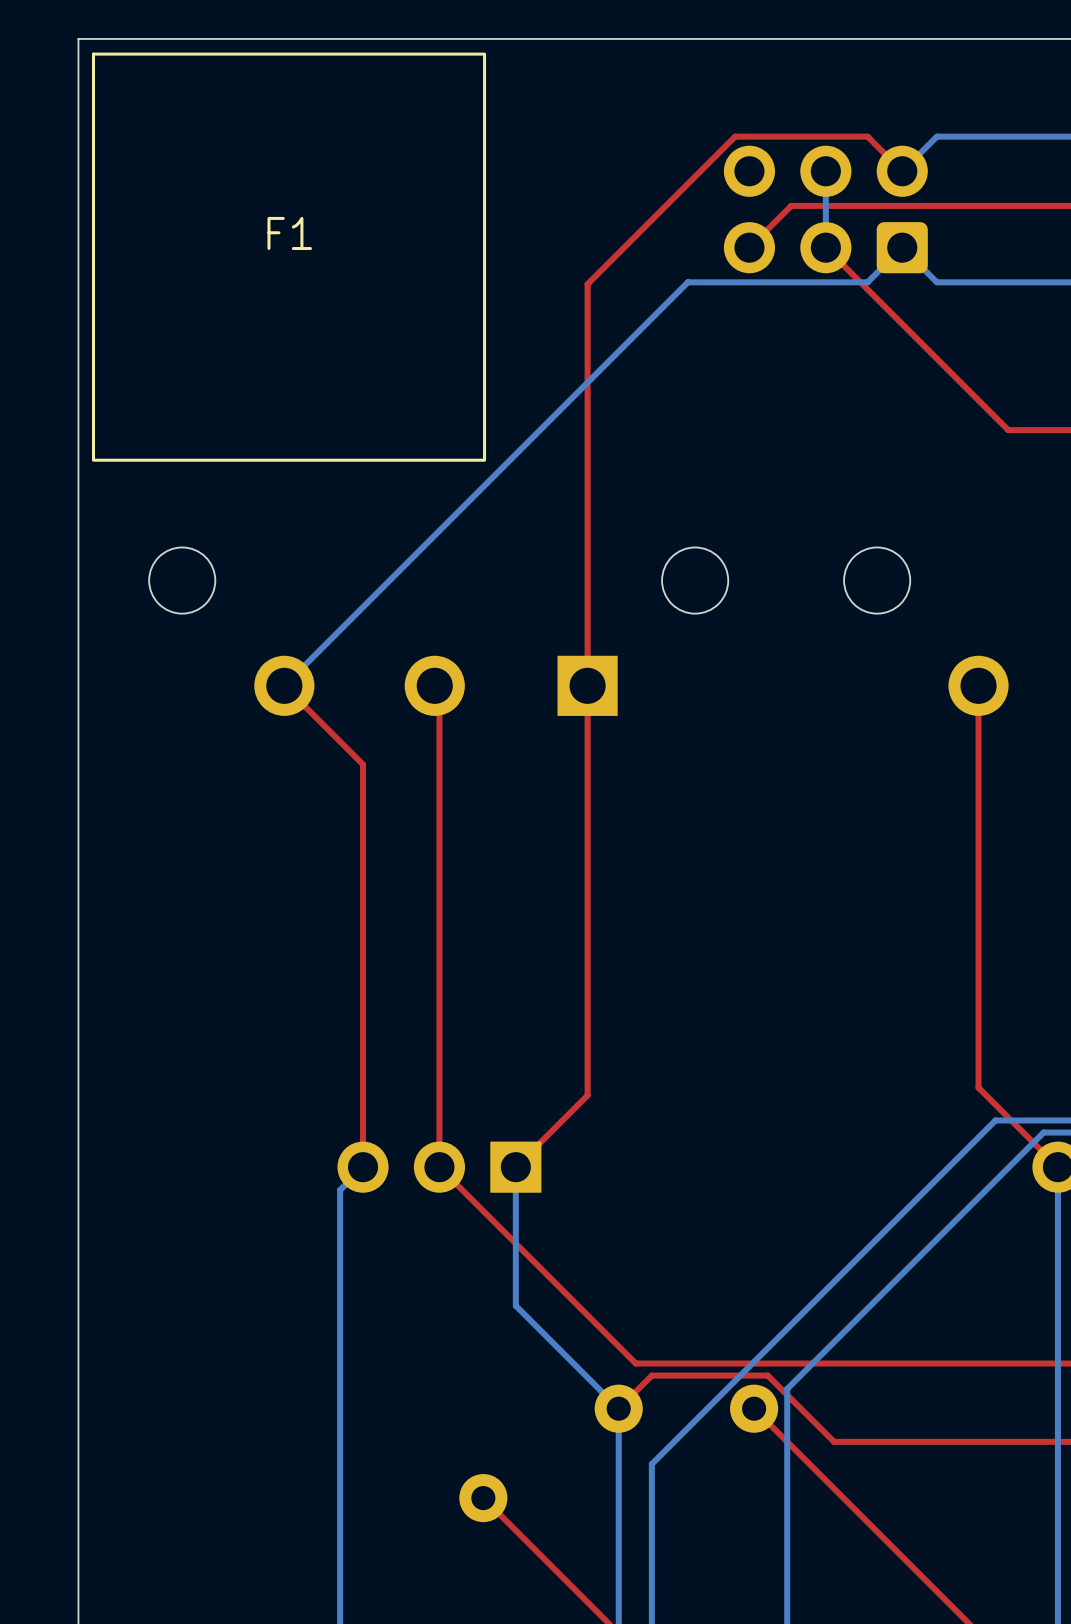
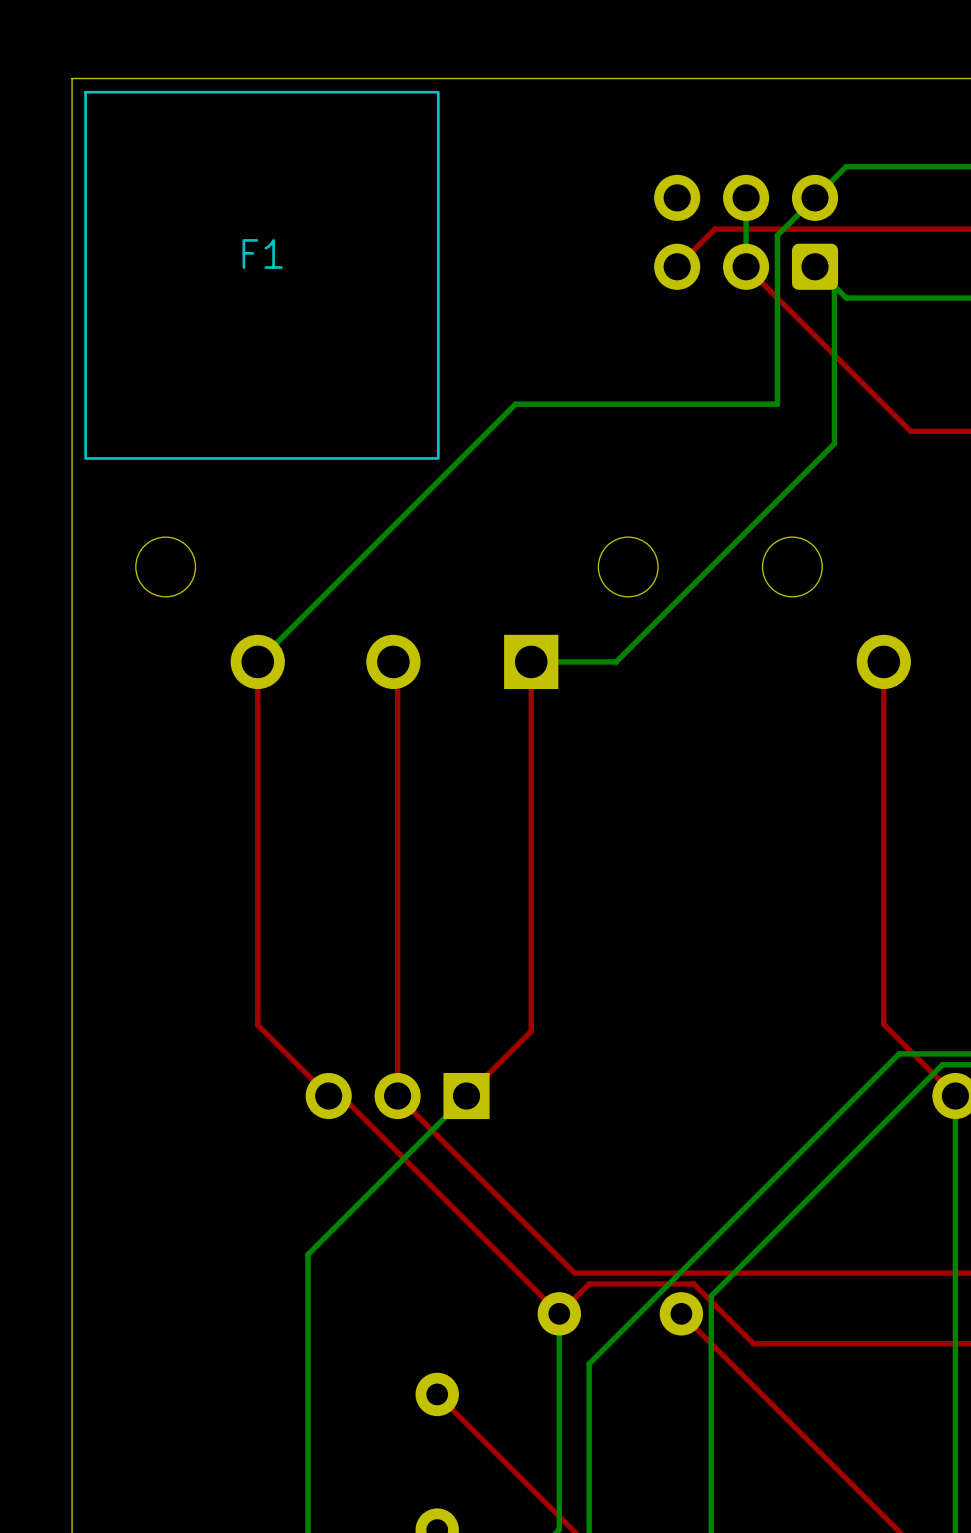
top track: (902, 171) (867, 136) (735, 136) (587, 284) (587, 685) -> none
bottom track: (902, 247) (867, 282) (687, 282) (570, 400) -> (815, 197) (777, 235) (777, 404) (515, 404)
bottom track: none -> (834, 286) (834, 443) (616, 661) (531, 661)
top track: (284, 685) (363, 764) (363, 1167) -> (257, 661) (257, 1025) (328, 1096) (341, 1096) (559, 1313)
bottom track: (363, 1167) (340, 1190) (340, 1342) -> (466, 1096) (308, 1254)
bottom track: (515, 1167) (515, 1305) (618, 1408) -> none

